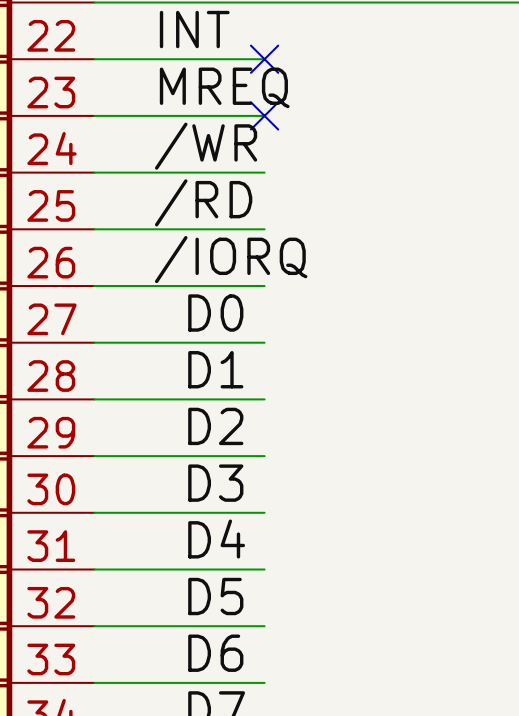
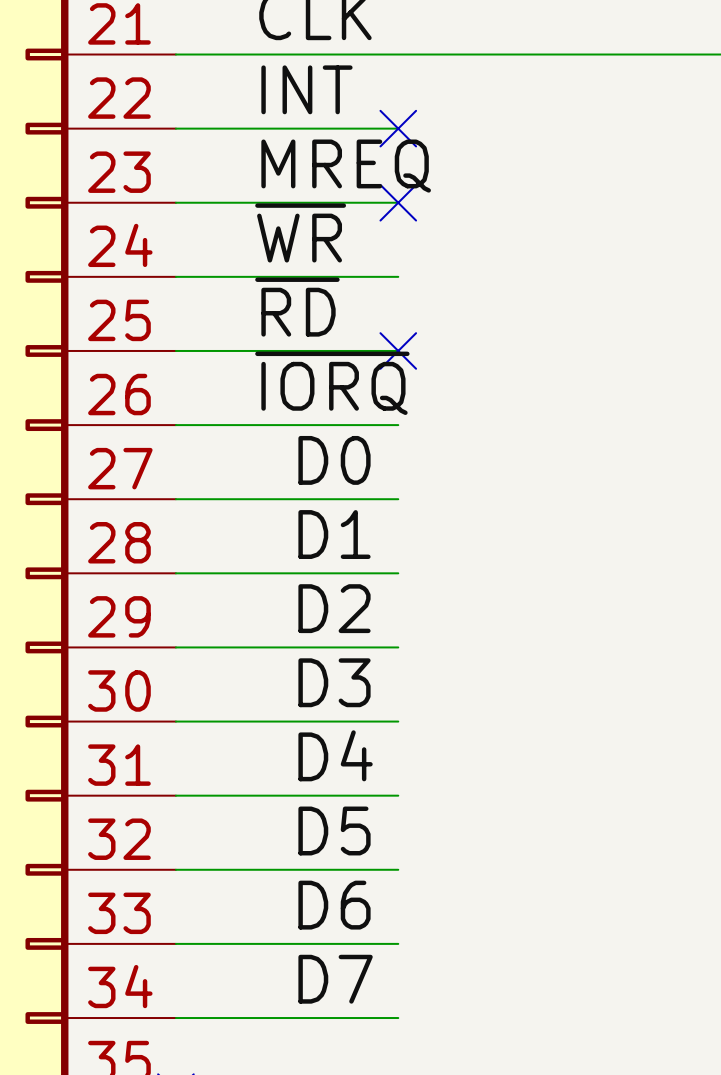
label: /WR (206, 146) -> ~{WR} (300, 232)
label: /RD (203, 202) -> ~{RD} (297, 307)
no-connect mark: none -> (398, 350)
label: /IORQ (231, 259) -> ~{IORQ} (332, 383)

